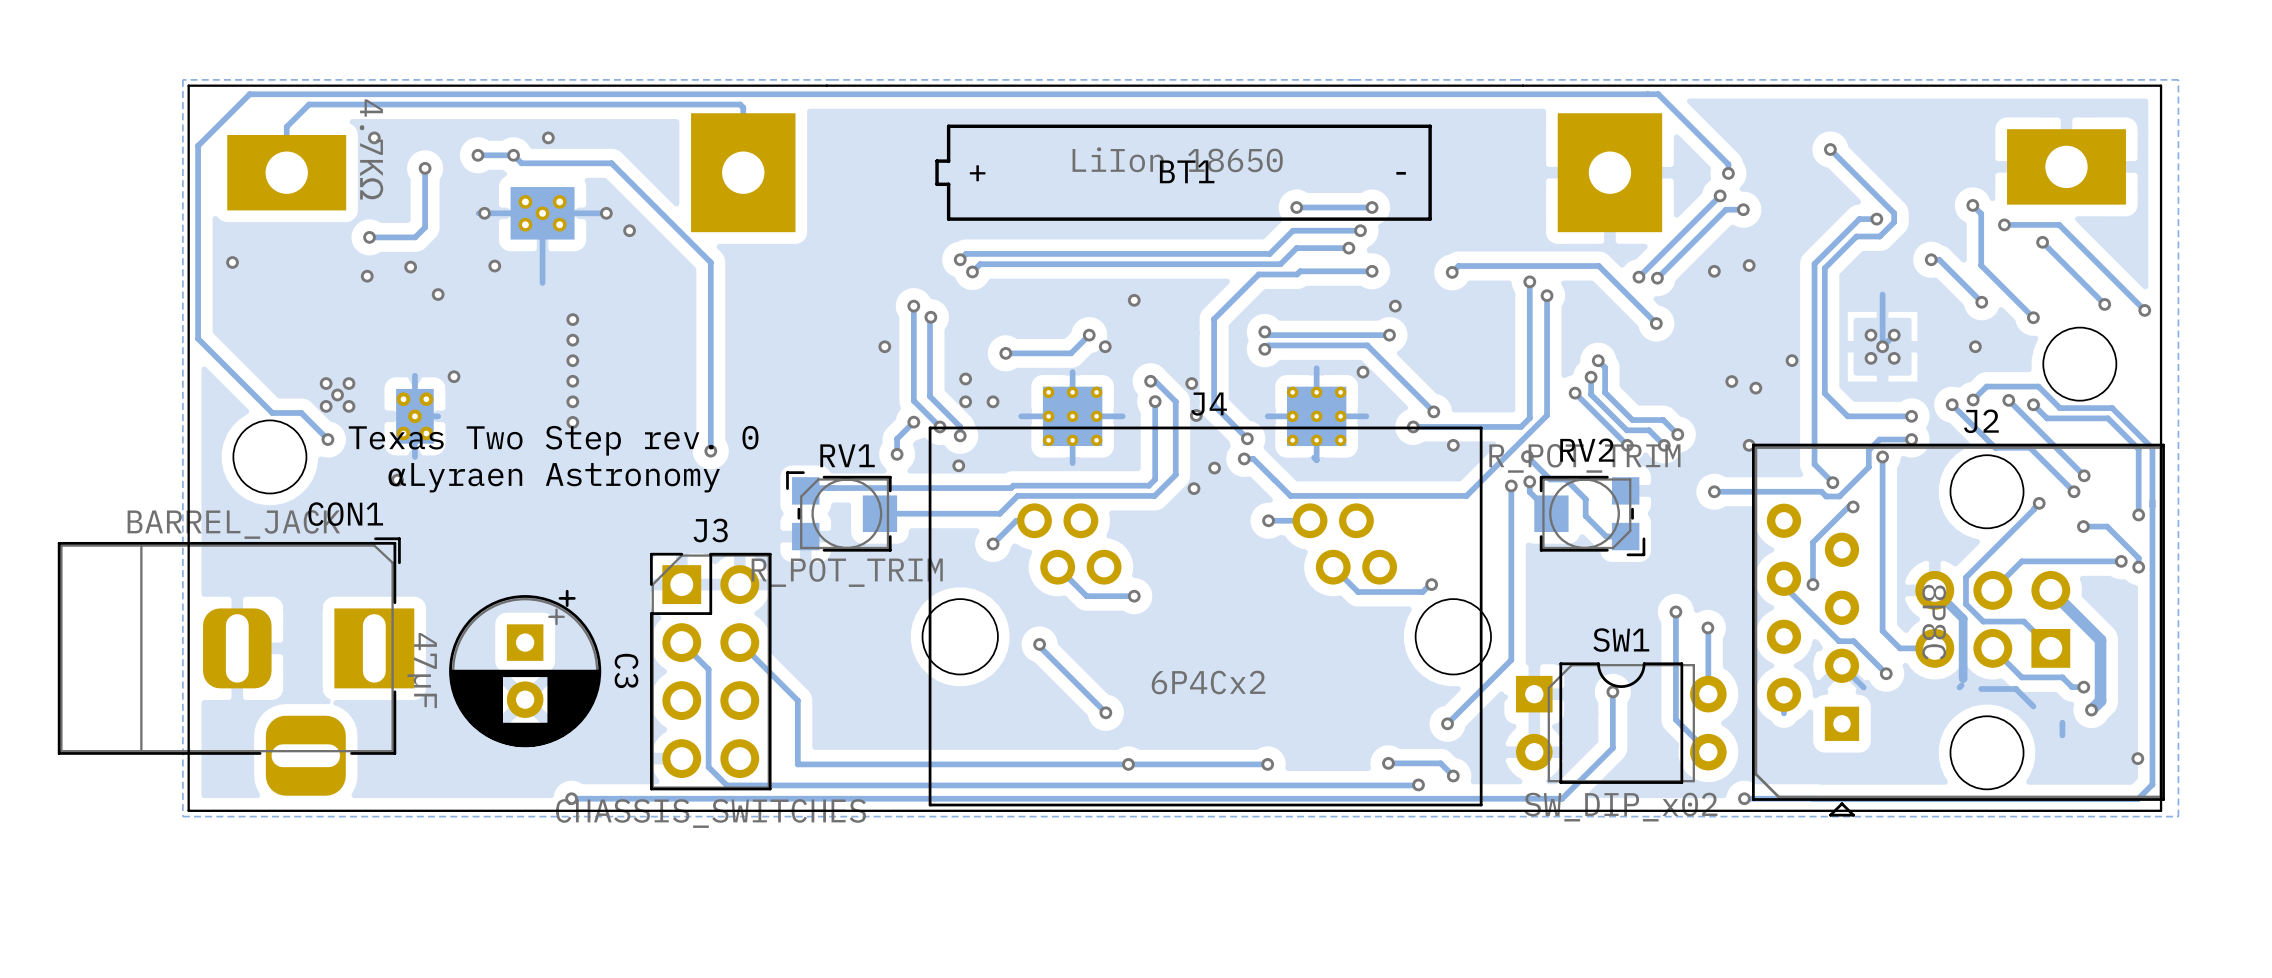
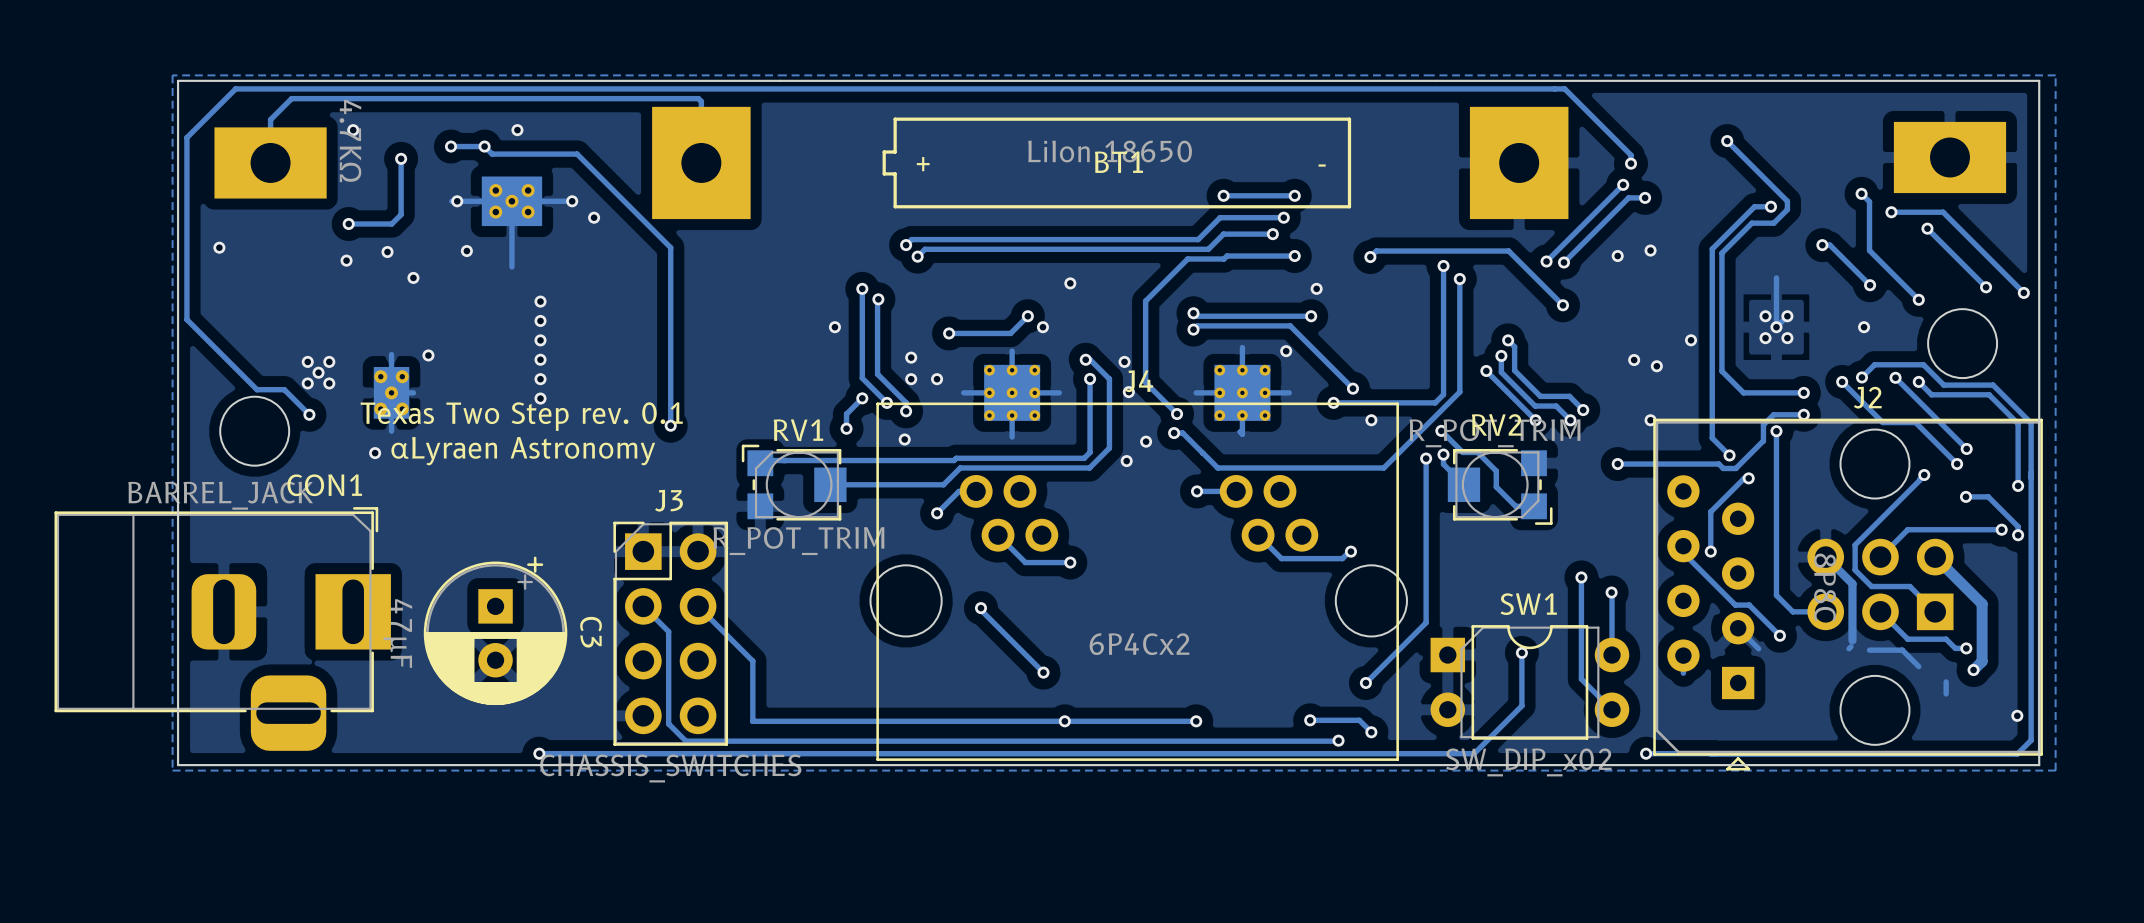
text: Texas Two Step rev. 0 (553, 440) -> Texas Two Step rev. 0.1 (521, 416)

